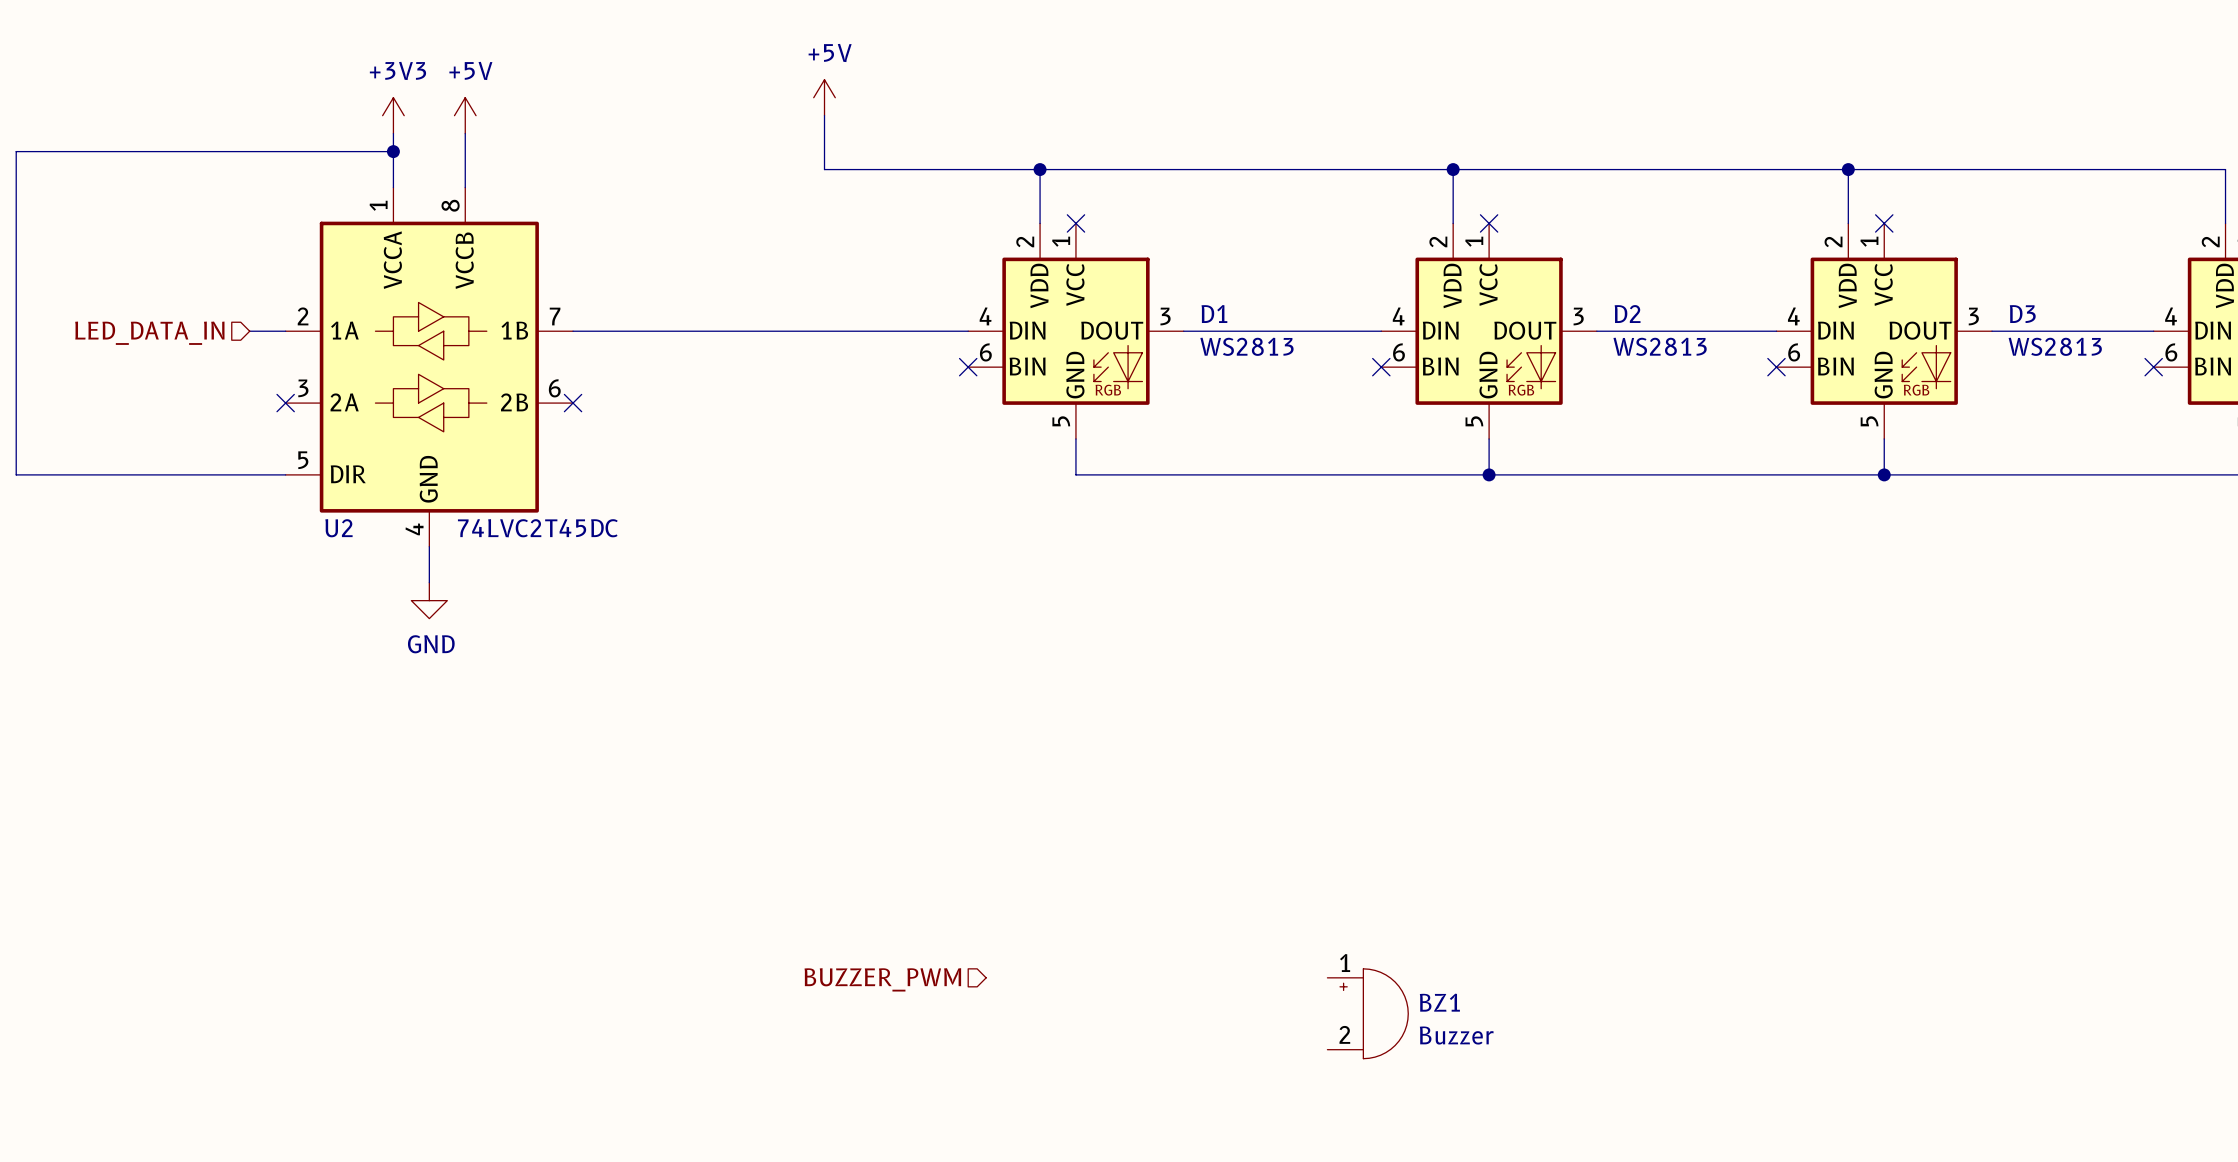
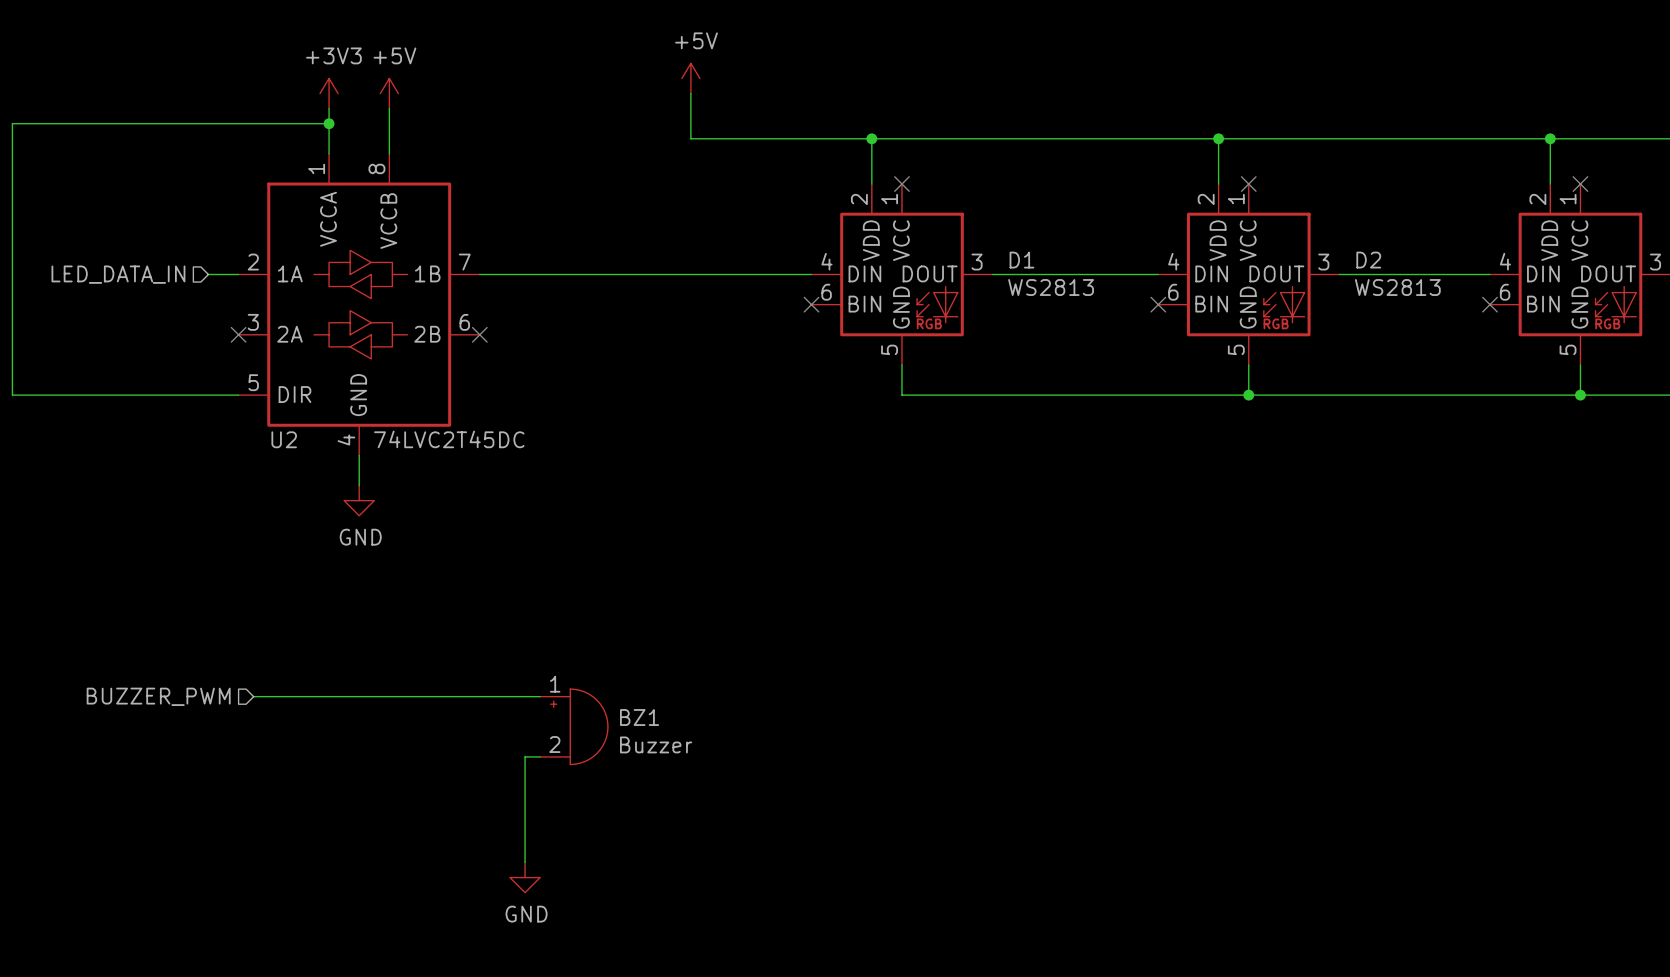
wire: none -> (253, 696) (540, 696)
hierarchical label: none -> BUZZER_PWM (158, 696)
wire: none -> (540, 756) (525, 756) (525, 862)
hierarchical label: BUZZER_PWM (882, 979) -> none
BZ1 position: (1367, 1013) -> (574, 726)
power symbol: none -> GND (525, 877)

